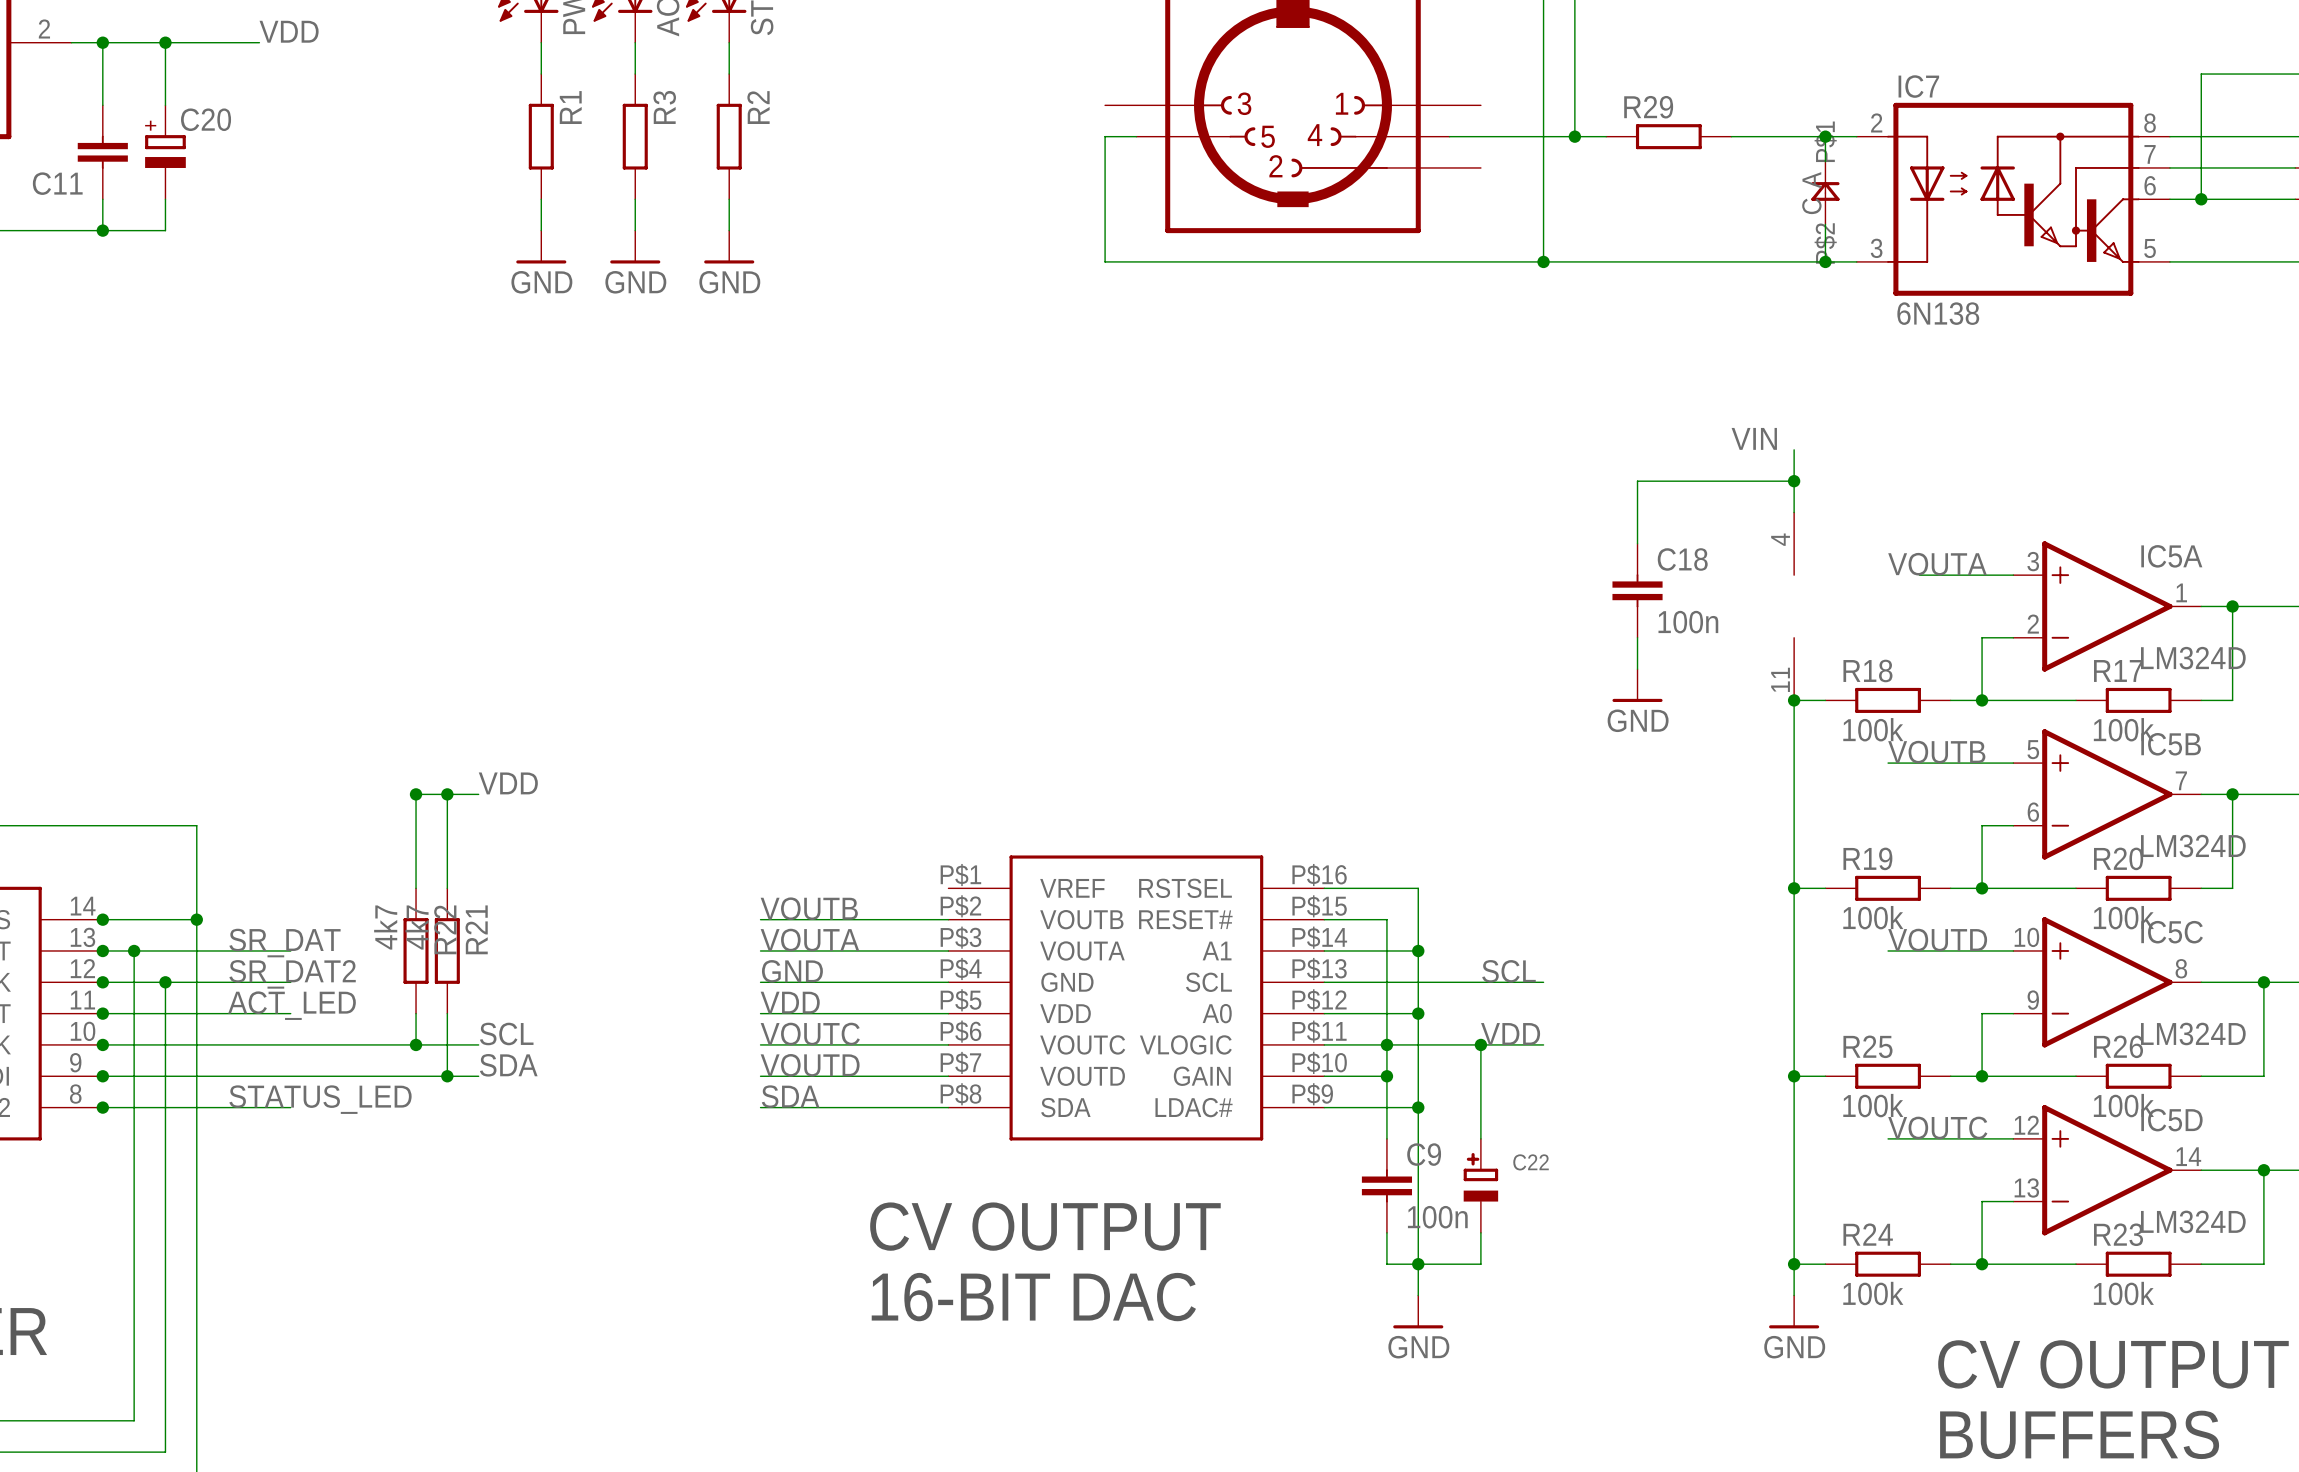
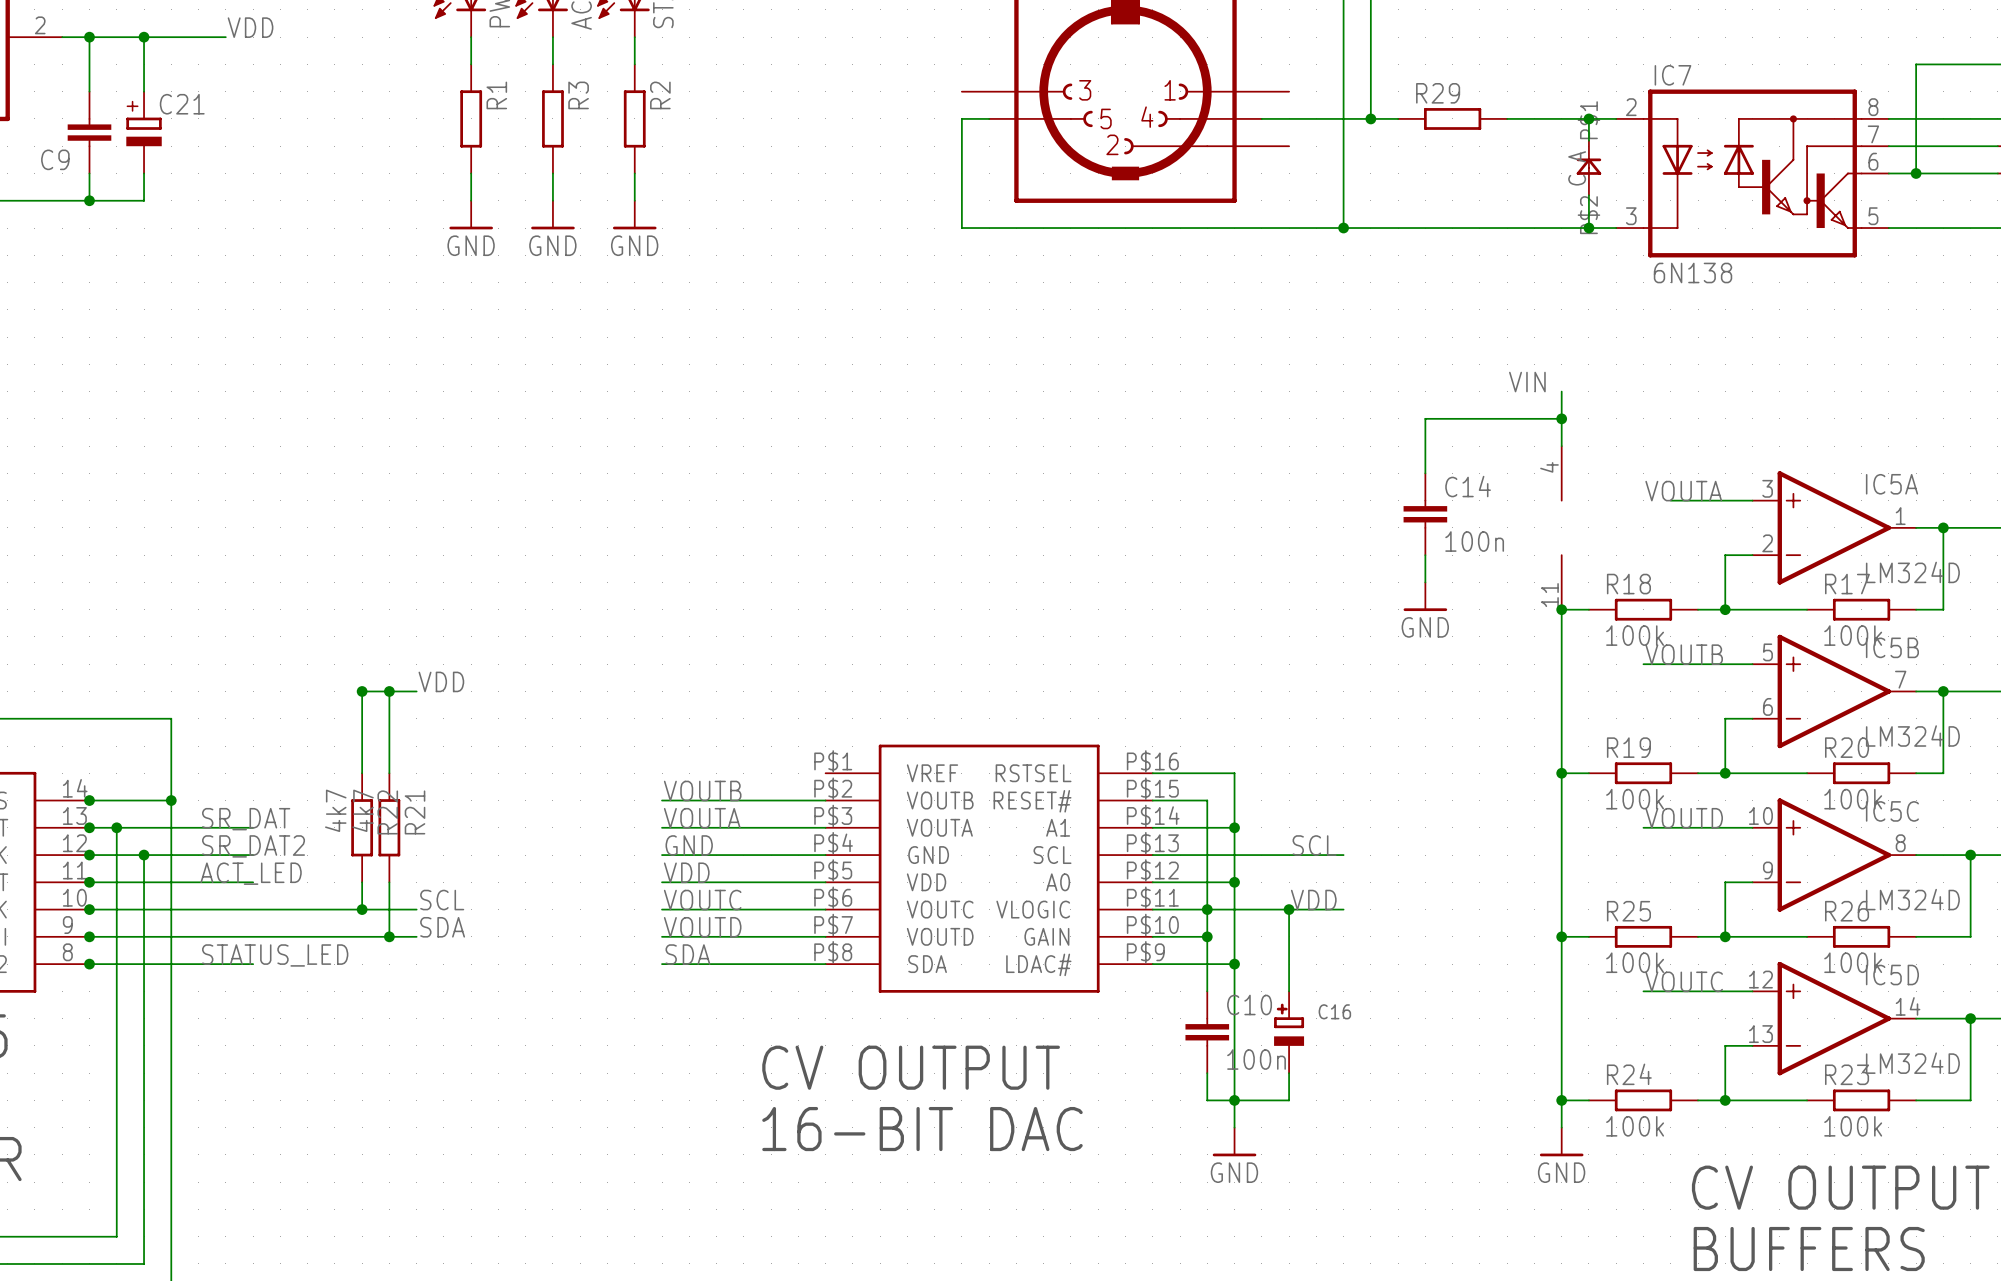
C20 name: C20 (206, 119) -> C21 (182, 104)
C11 name: C11 (57, 183) -> C9 (55, 159)
C18 name: C18 (1682, 559) -> C14 (1468, 486)
C9 name: C9 (1424, 1154) -> C10 (1249, 1005)
C22 name: C22 (1531, 1162) -> C16 (1334, 1011)

